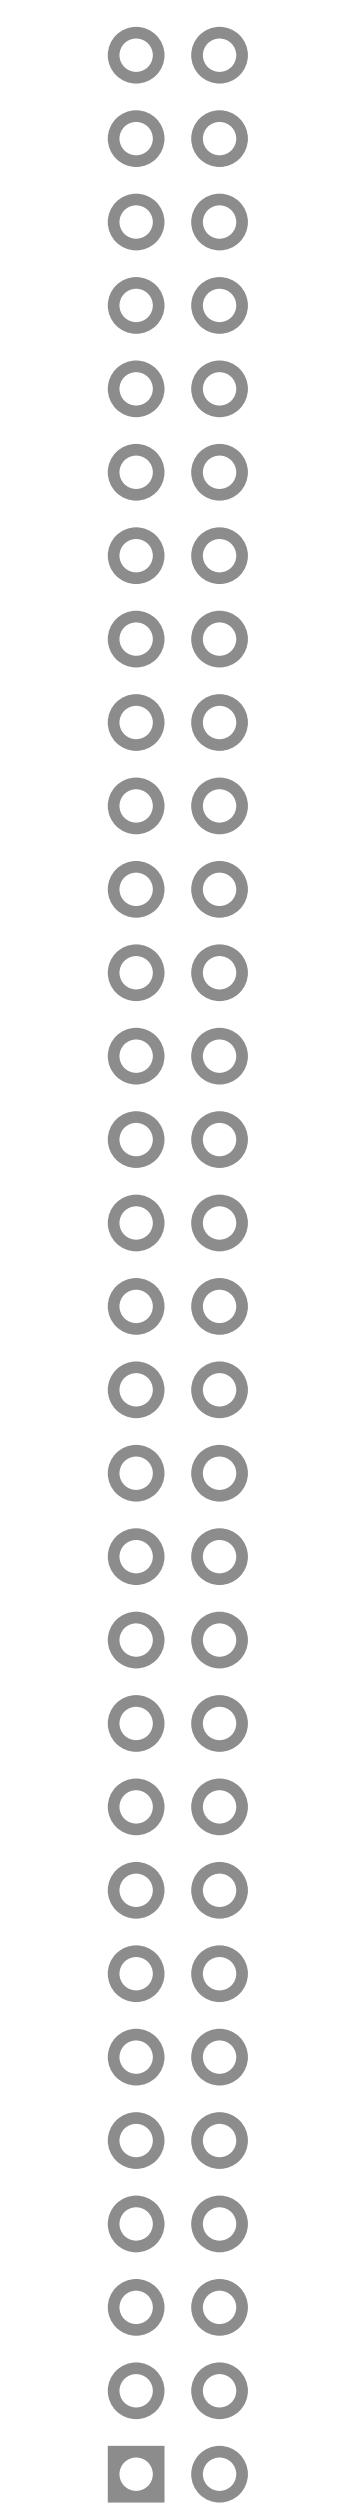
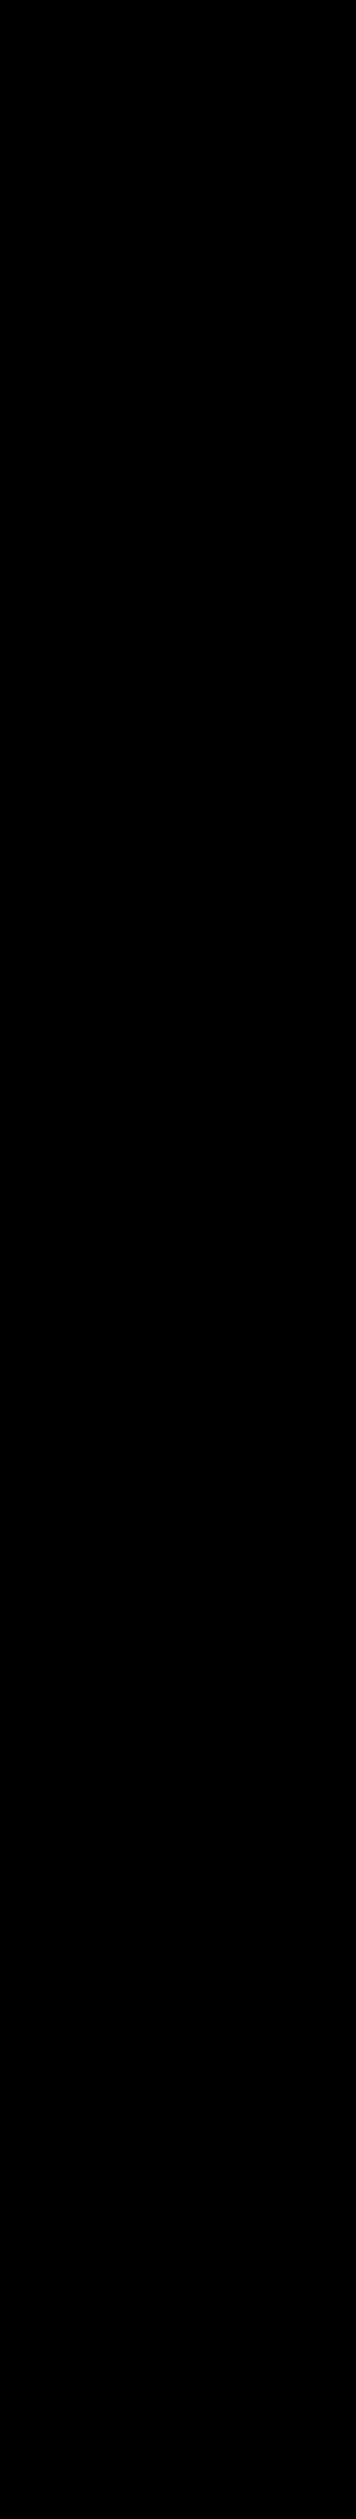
part: (177, 1264) -> none

